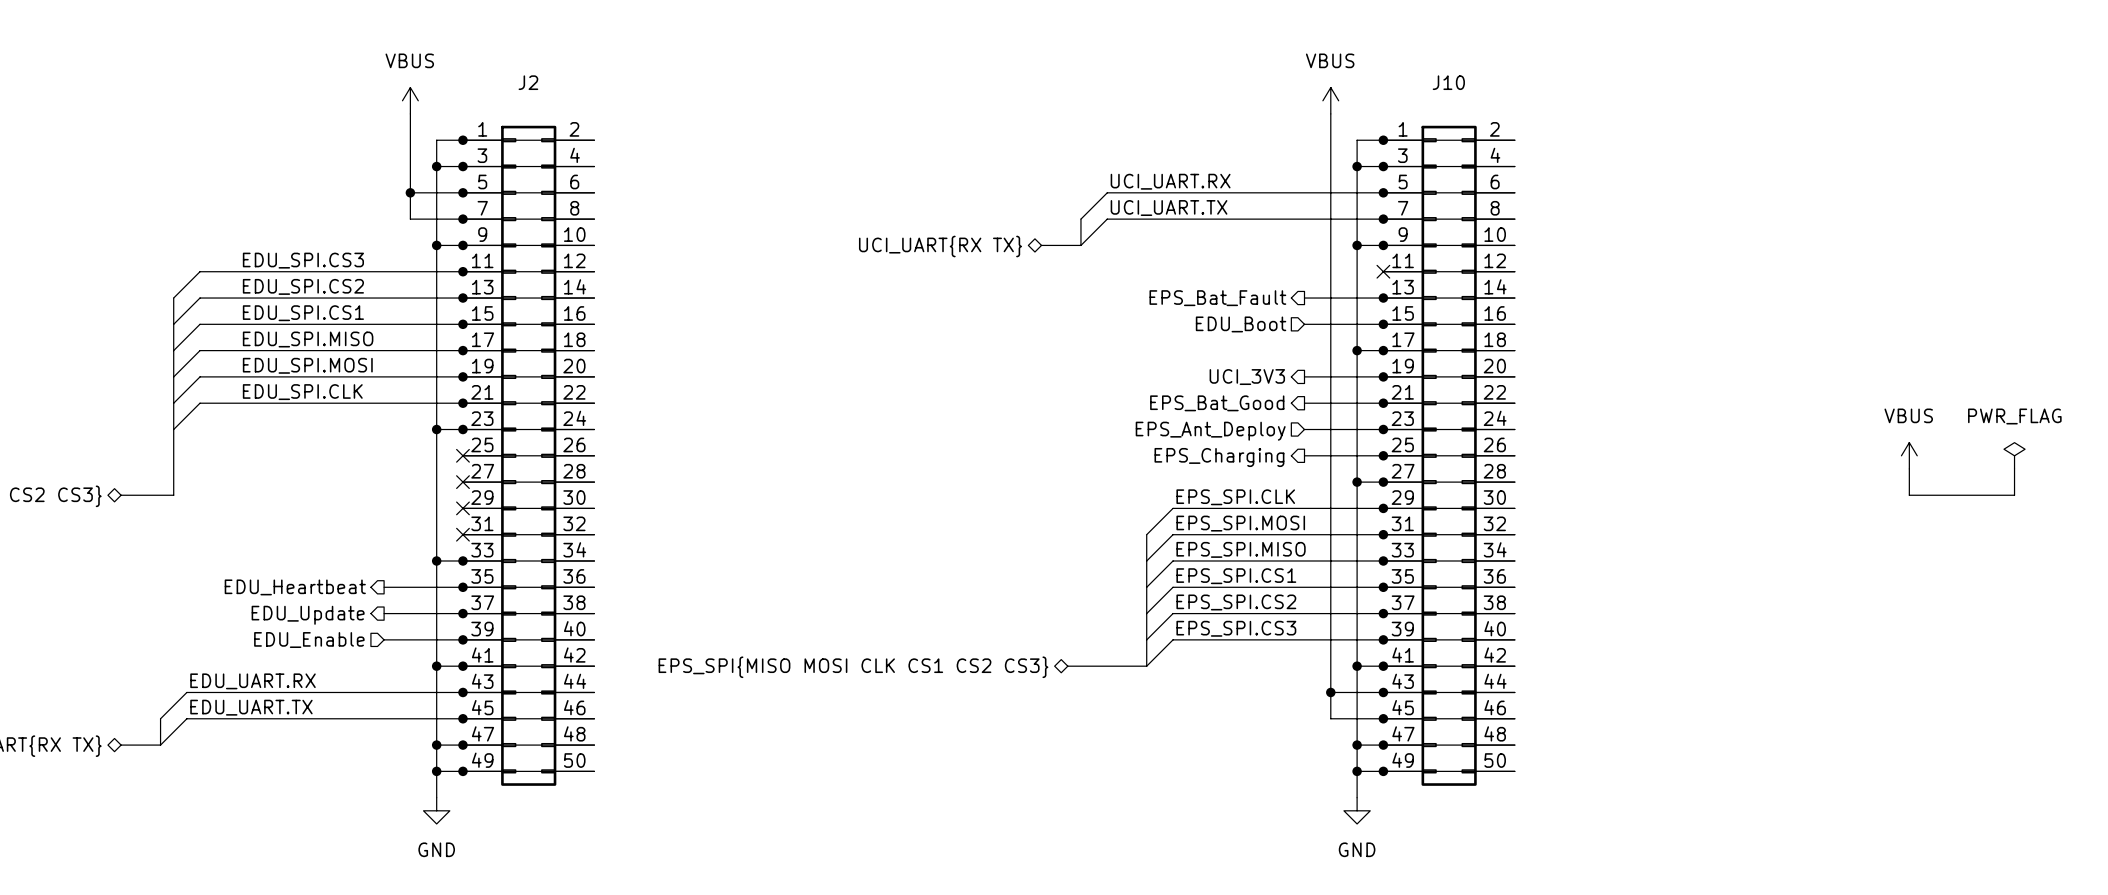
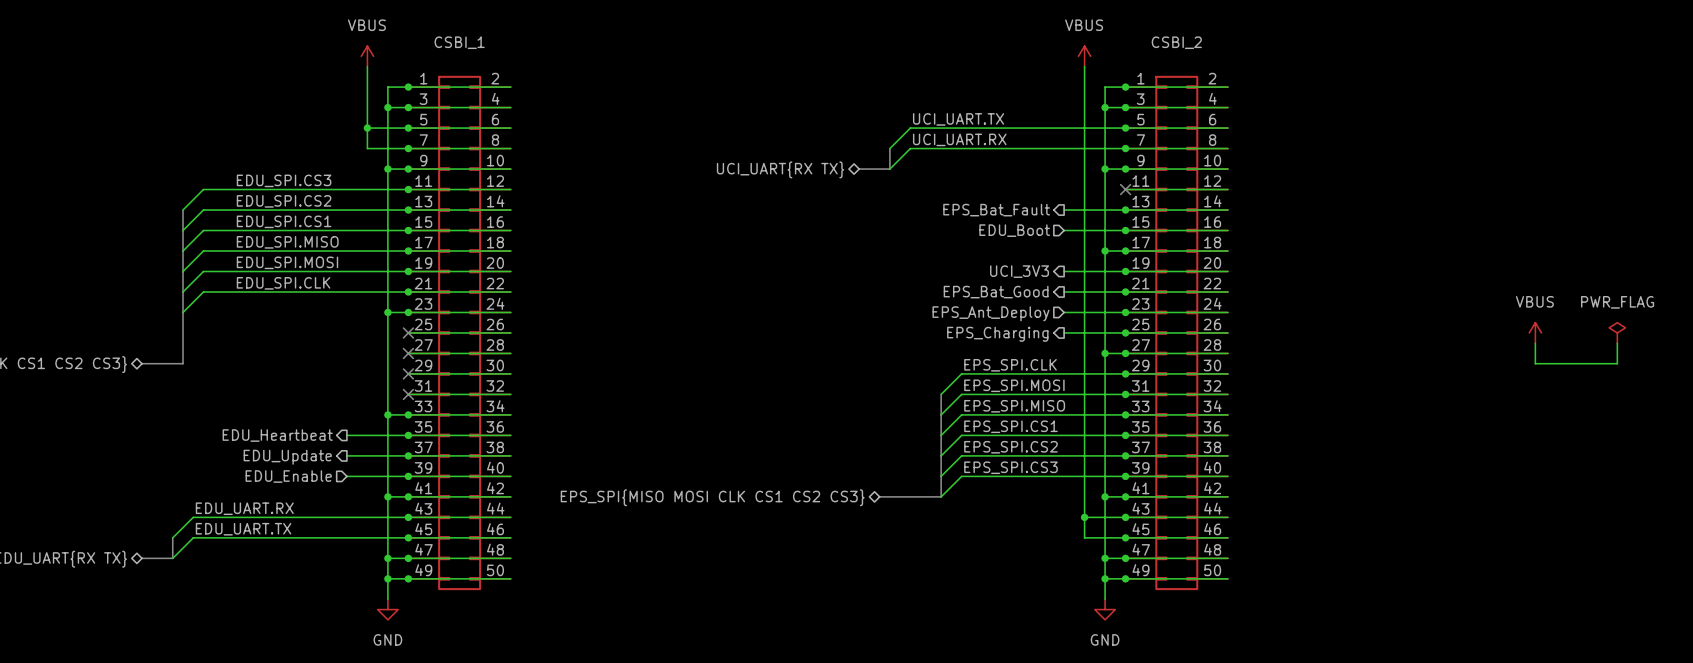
J2 name: J2 (528, 82) -> CSBI_1 (459, 42)
J10 name: J10 (1448, 82) -> CSBI_2 (1176, 42)
label: UCI_UART.RX (1170, 181) -> UCI_UART.TX (958, 119)
label: UCI_UART.TX (1169, 208) -> UCI_UART.RX (959, 139)

